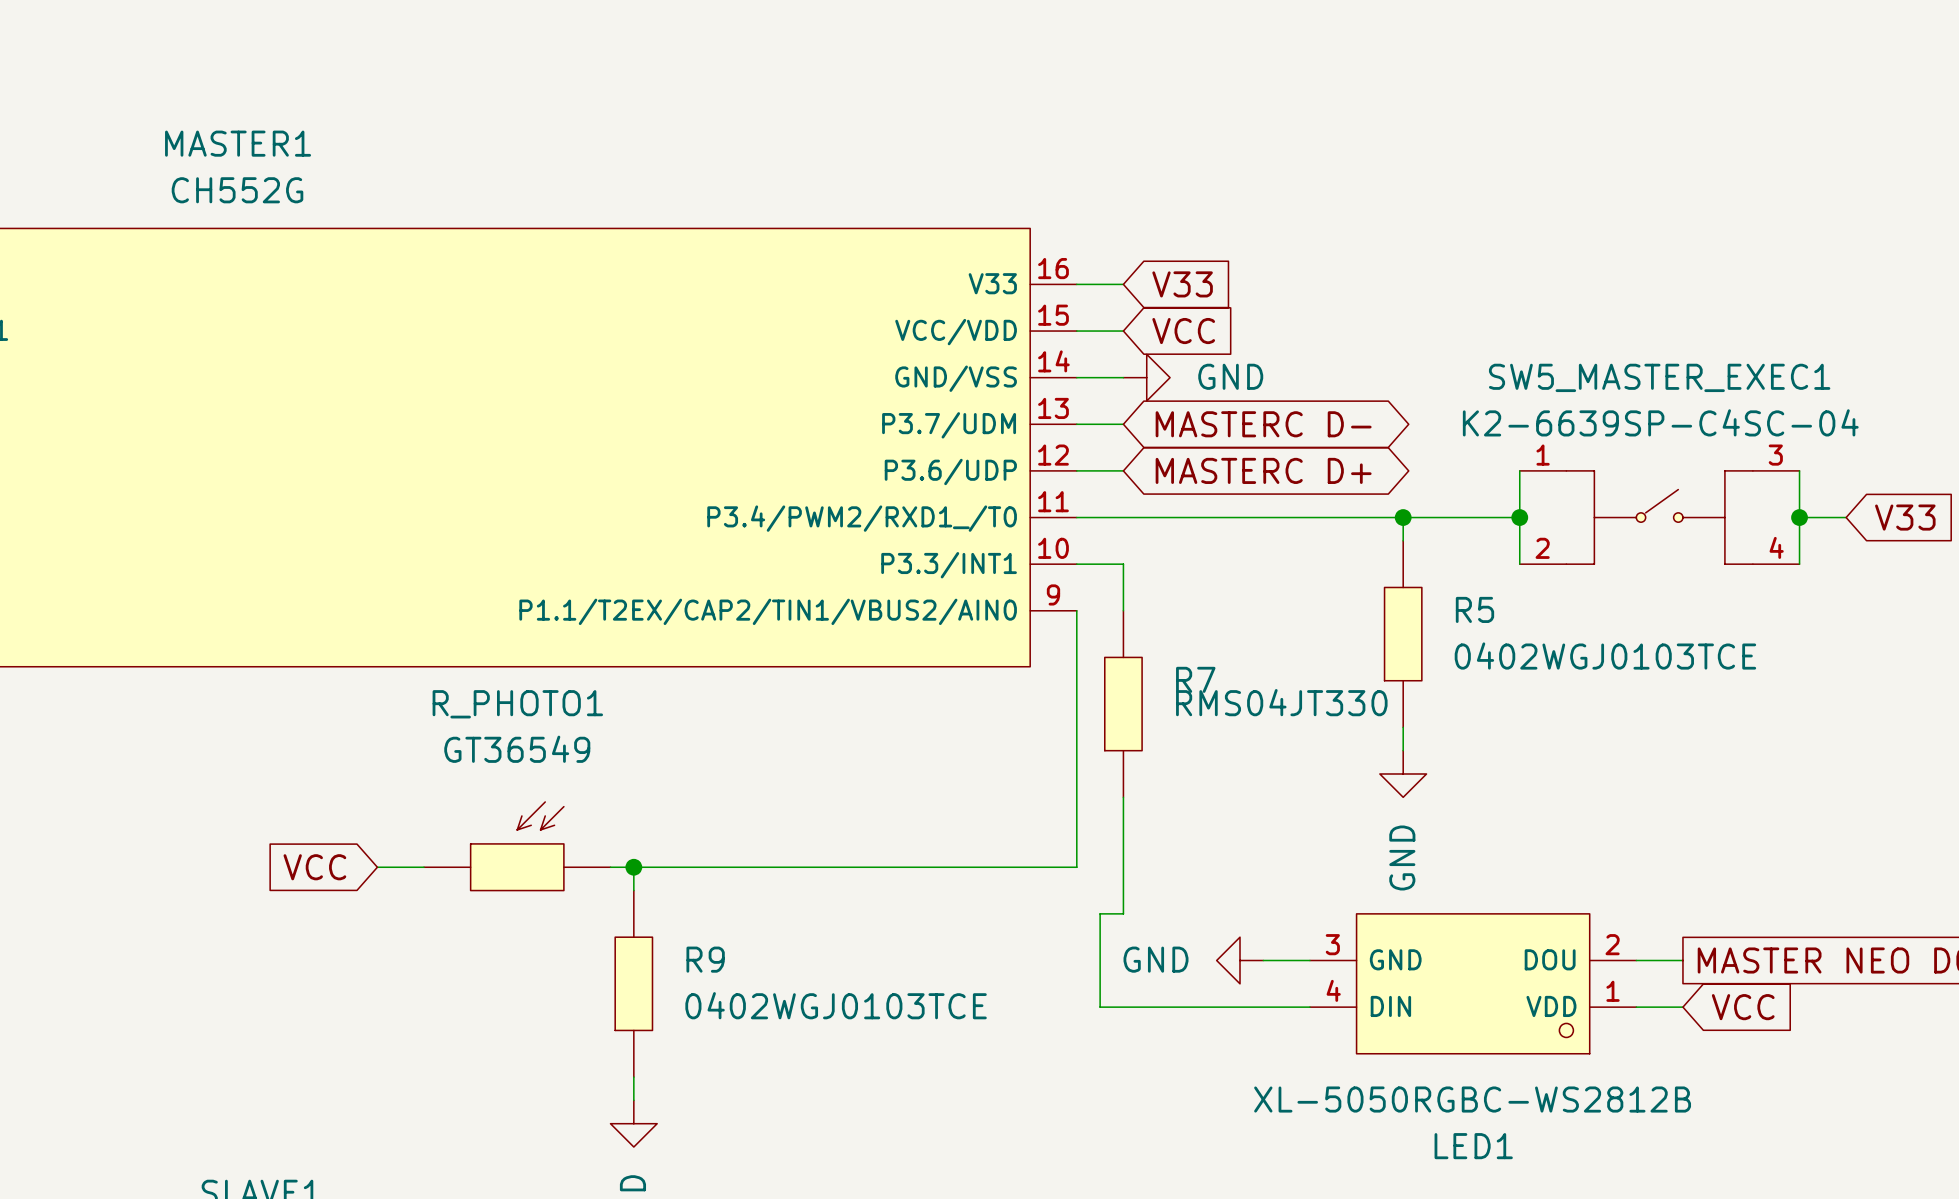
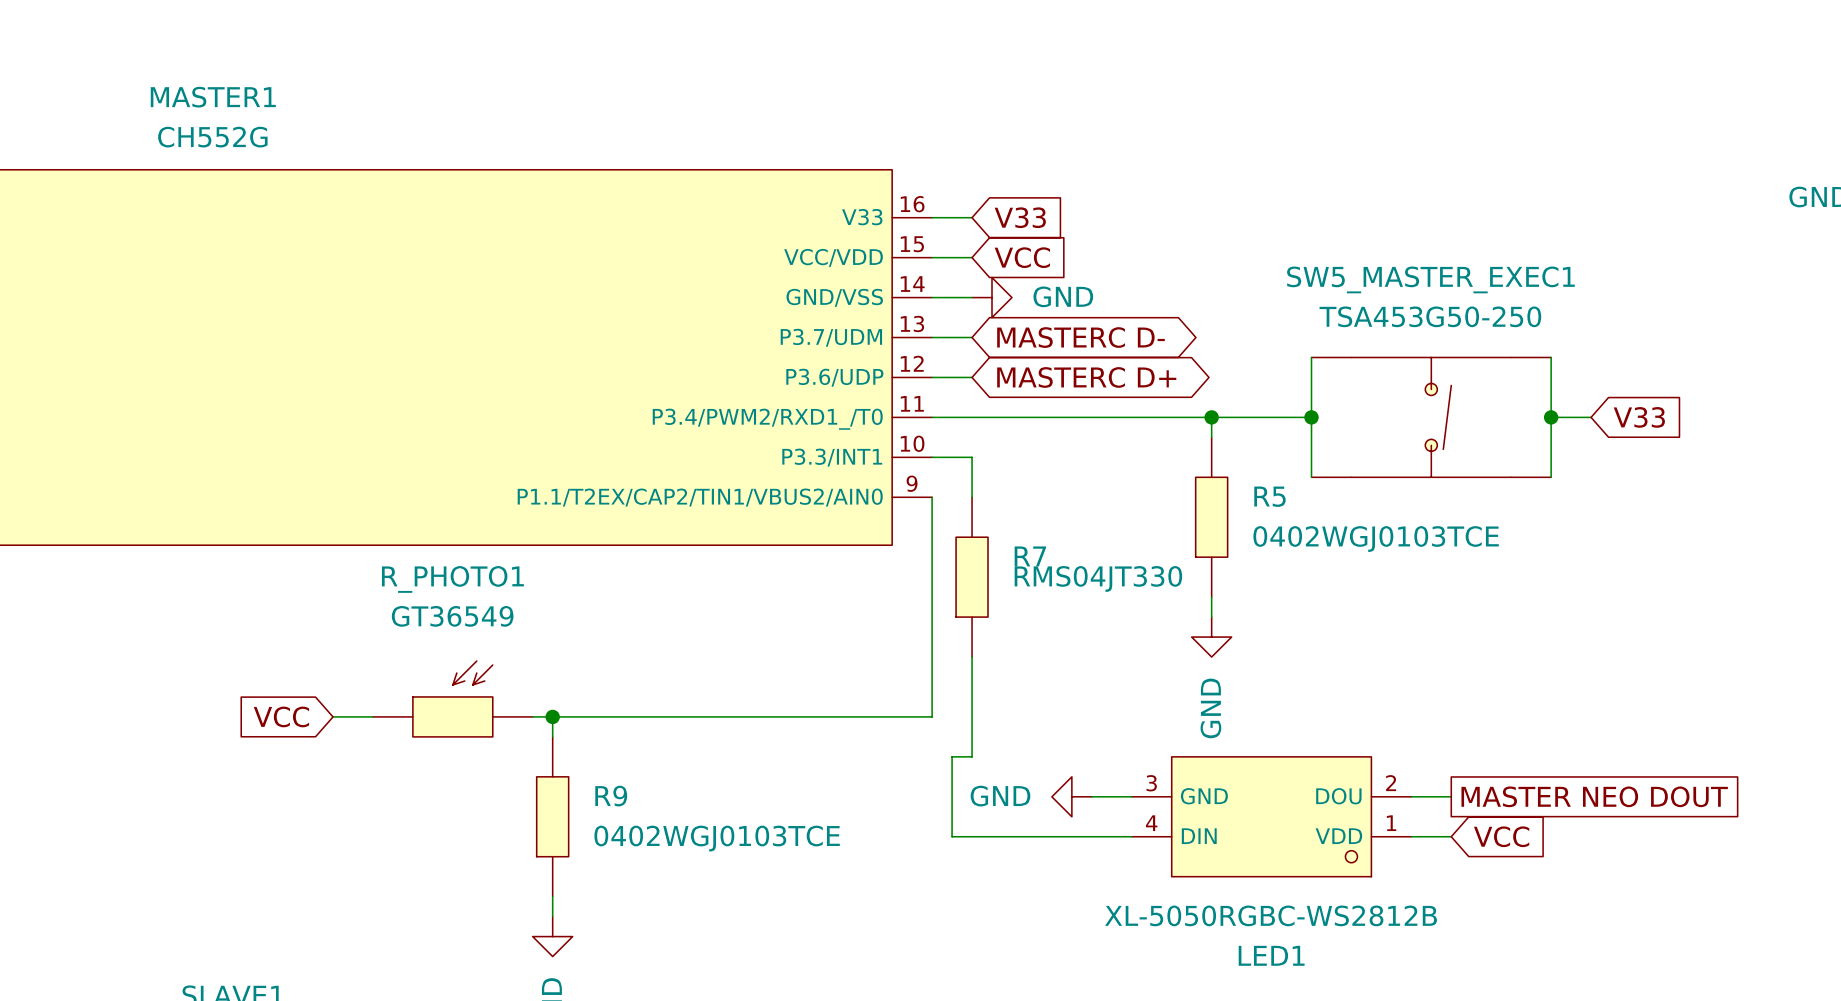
SW5_MASTER_EXEC1 value: K2-6639SP-C4SC-04 (1660, 422) -> TSA453G50-250 (1430, 316)
wire: none -> (1311, 357) (1311, 377)
wire: none -> (1551, 357) (1551, 377)
SW5_MASTER_EXEC1 symbol: [1519, 470, 1800, 565] -> [1311, 357, 1552, 478]
wire: none -> (1311, 457) (1311, 477)
wire: none -> (1551, 457) (1551, 477)

